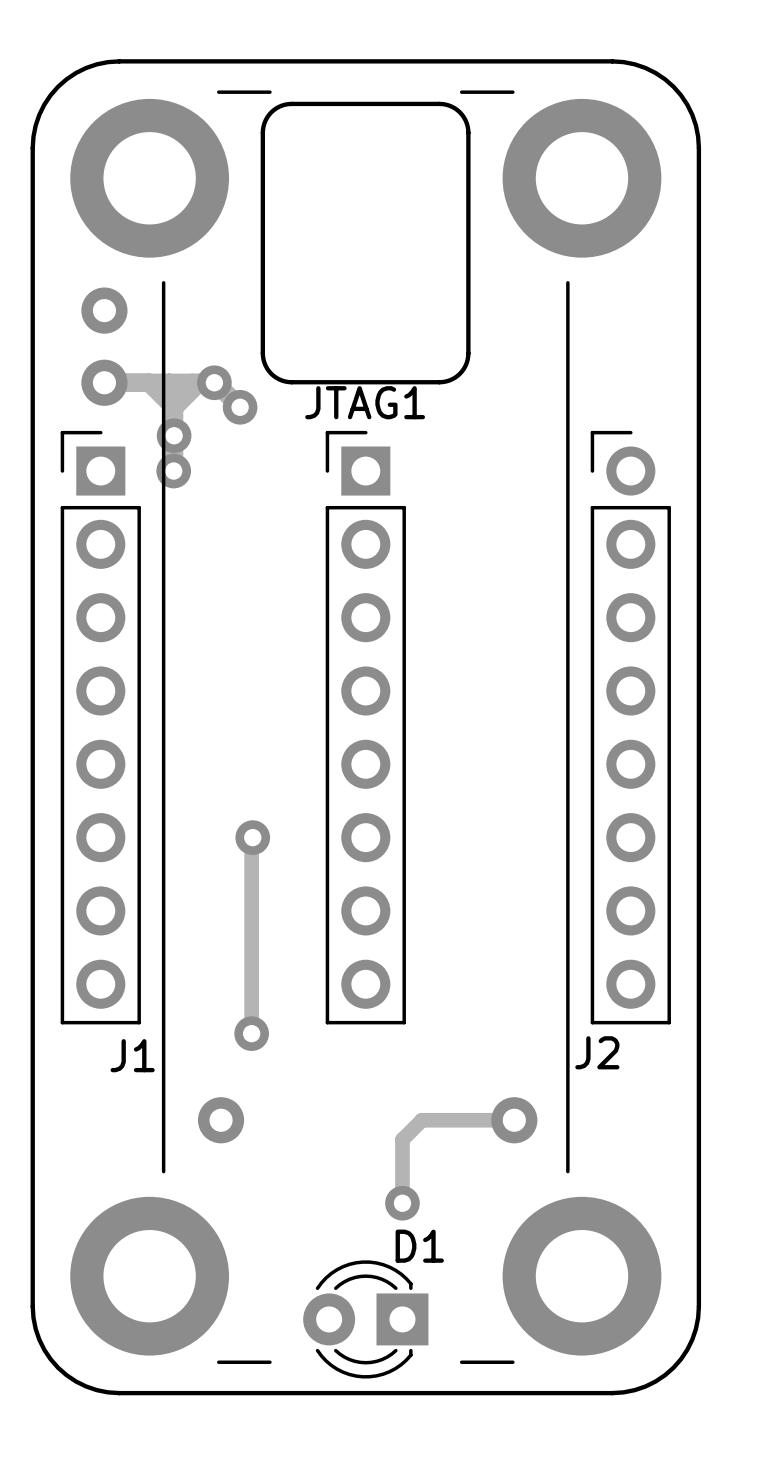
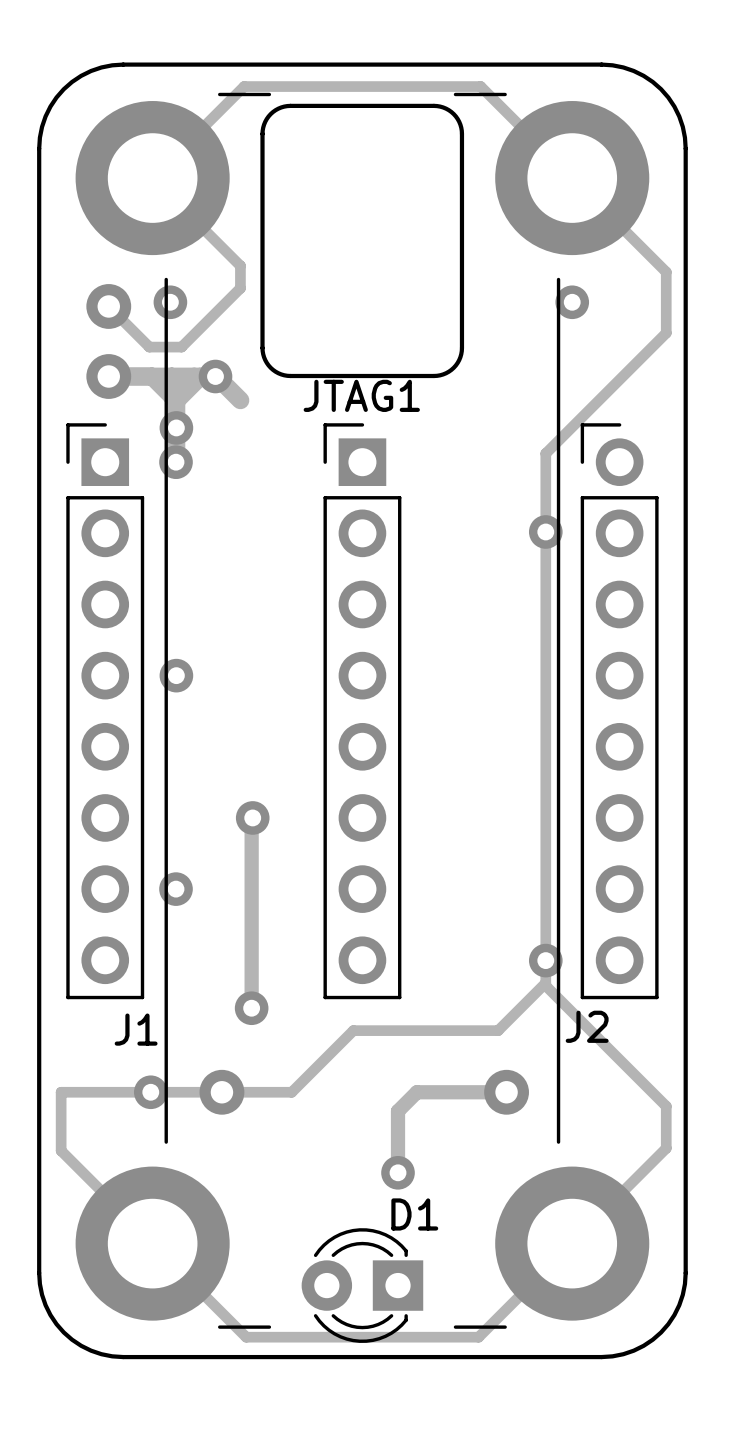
via: none -> (572, 302)
track: none -> (108, 306) (149, 347) (181, 347) (240, 288) (240, 265) (152, 178) (244, 86) (480, 86) (666, 272) (666, 333) (545, 453) (545, 985) (666, 1106) (666, 1148) (478, 1337) (246, 1337) (61, 1150) (61, 1092) (291, 1092) (353, 1030) (498, 1030) (545, 983)
via position: (240, 407) -> (170, 302)
via: none -> (545, 531)
via: none -> (176, 675)
via: none -> (176, 889)
via: none -> (545, 960)
via: none -> (150, 1092)

